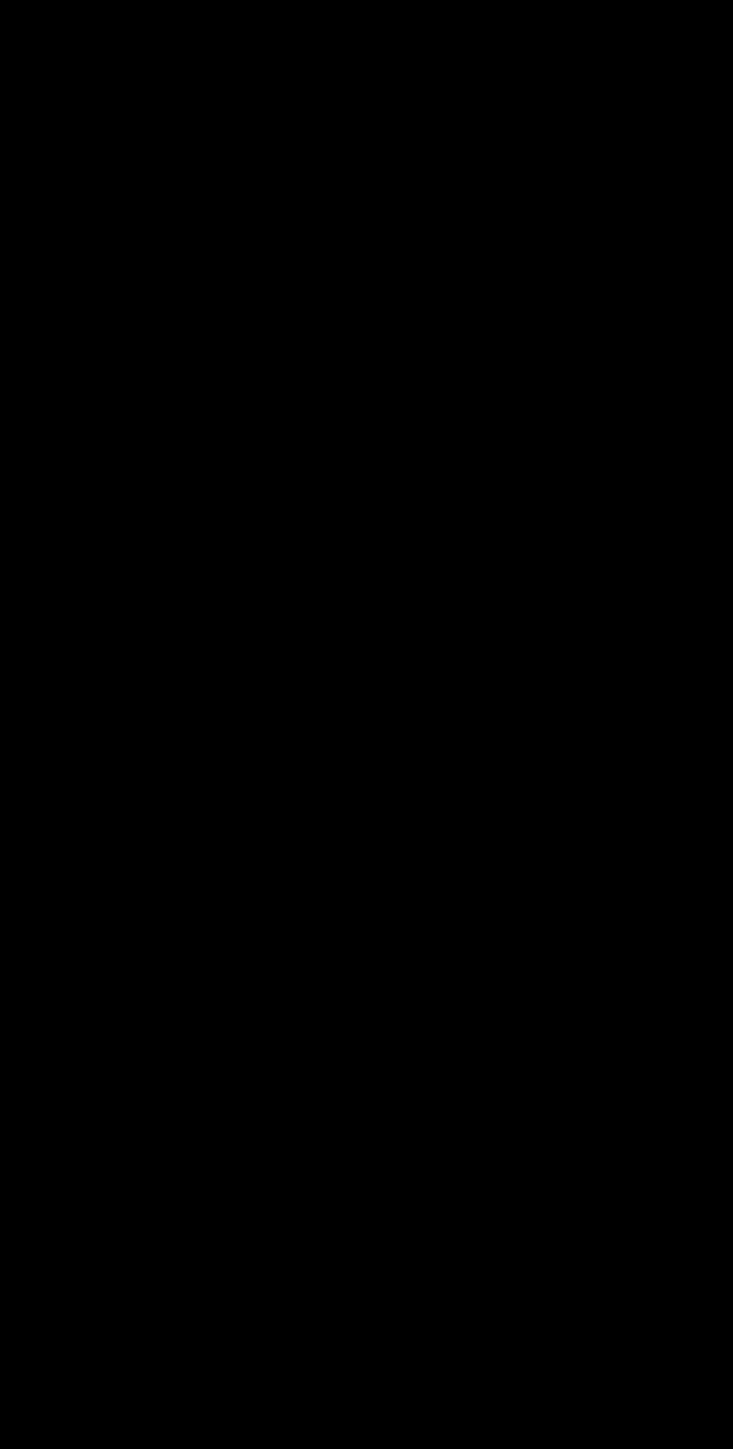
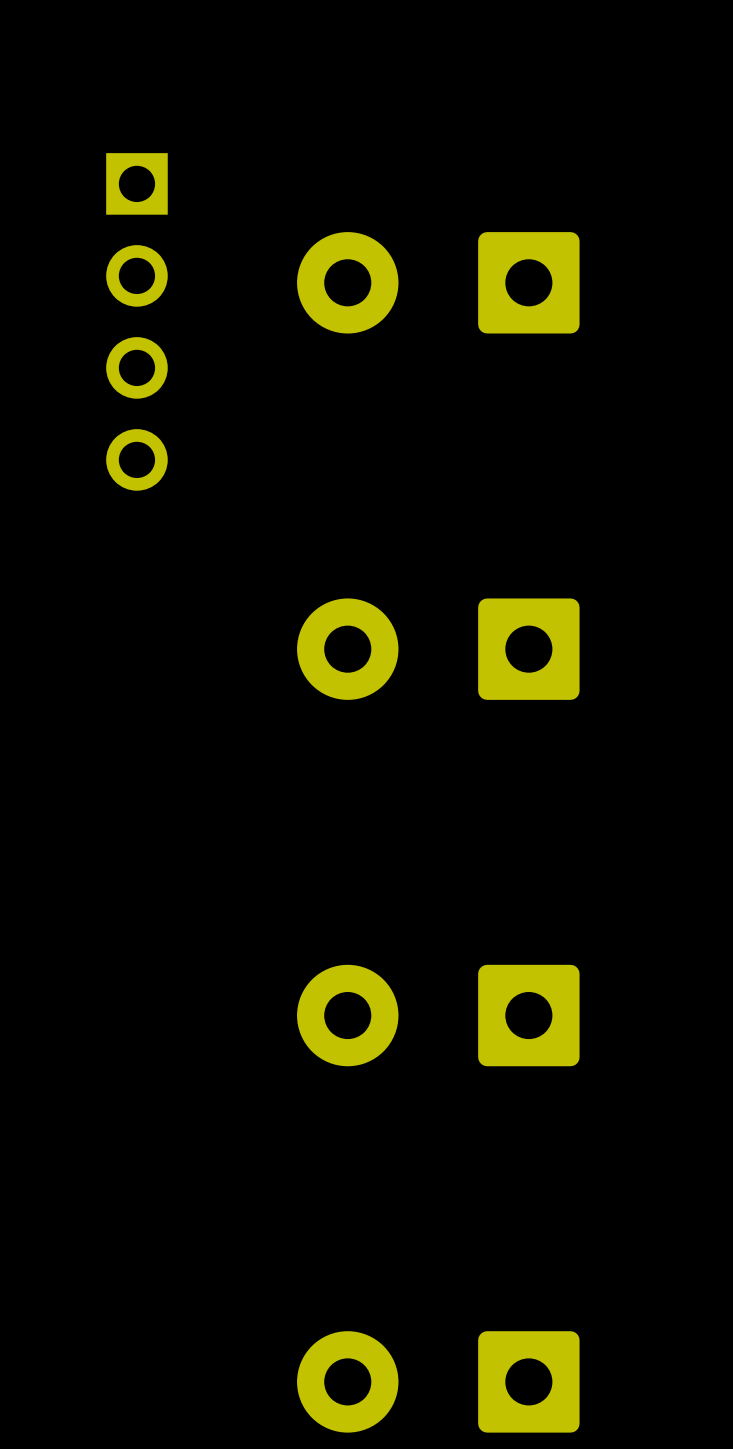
part: none -> (438, 282)
part: none -> (136, 321)
part: none -> (438, 649)
part: none -> (438, 1015)
part: none -> (438, 1381)

